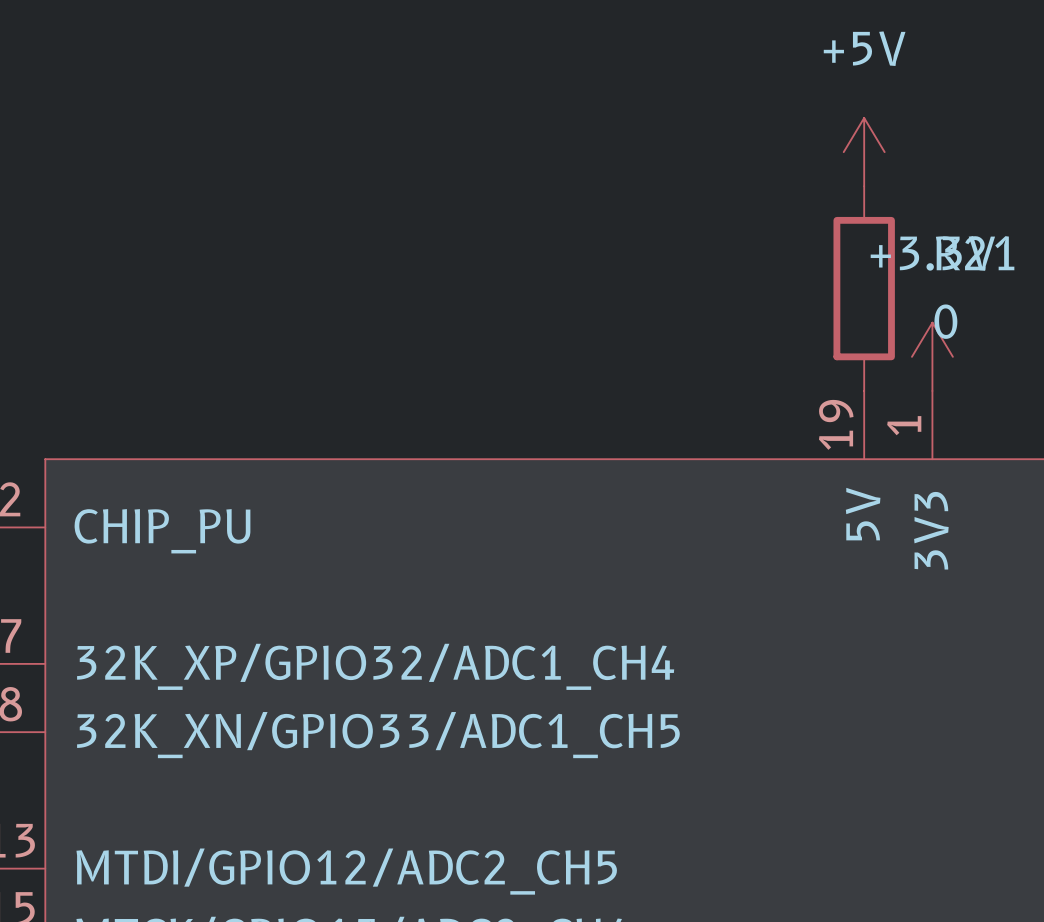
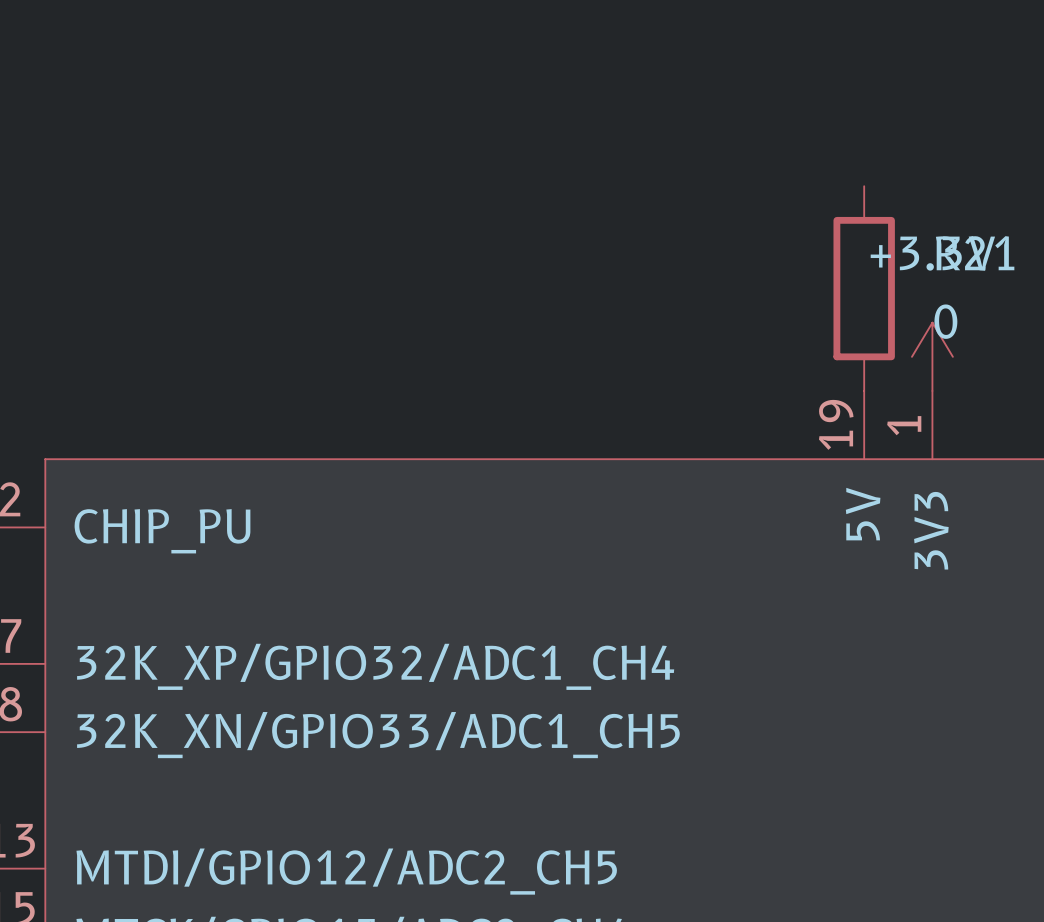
power symbol: +5V (864, 152) -> none

